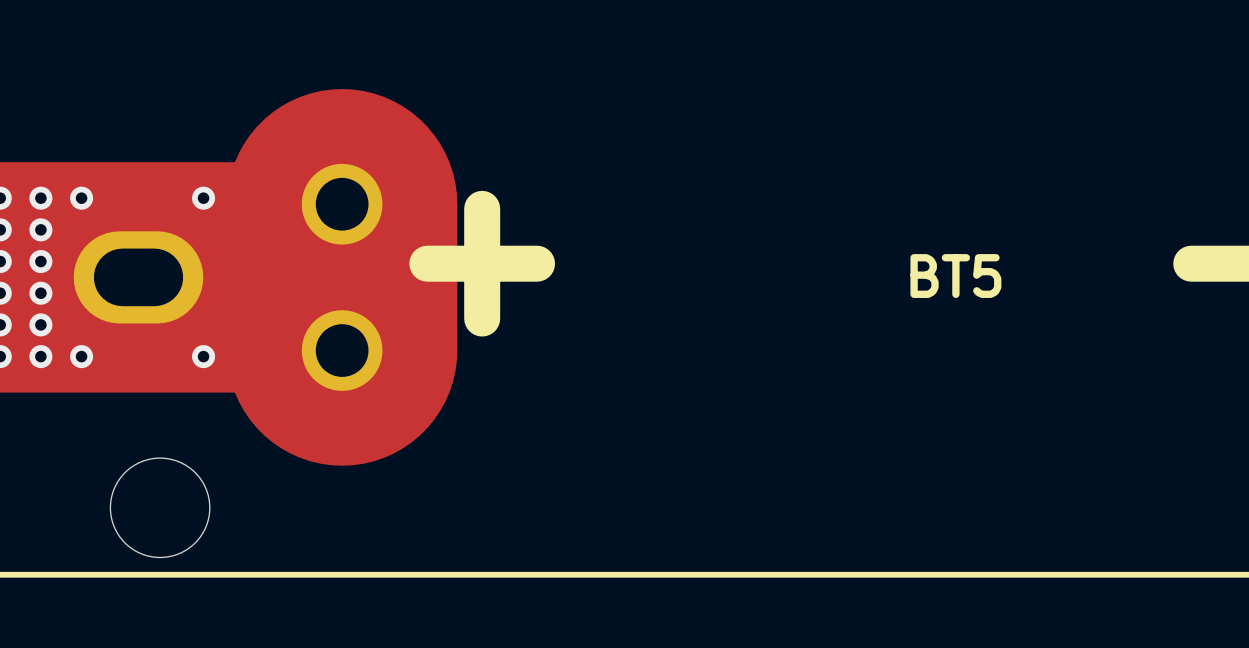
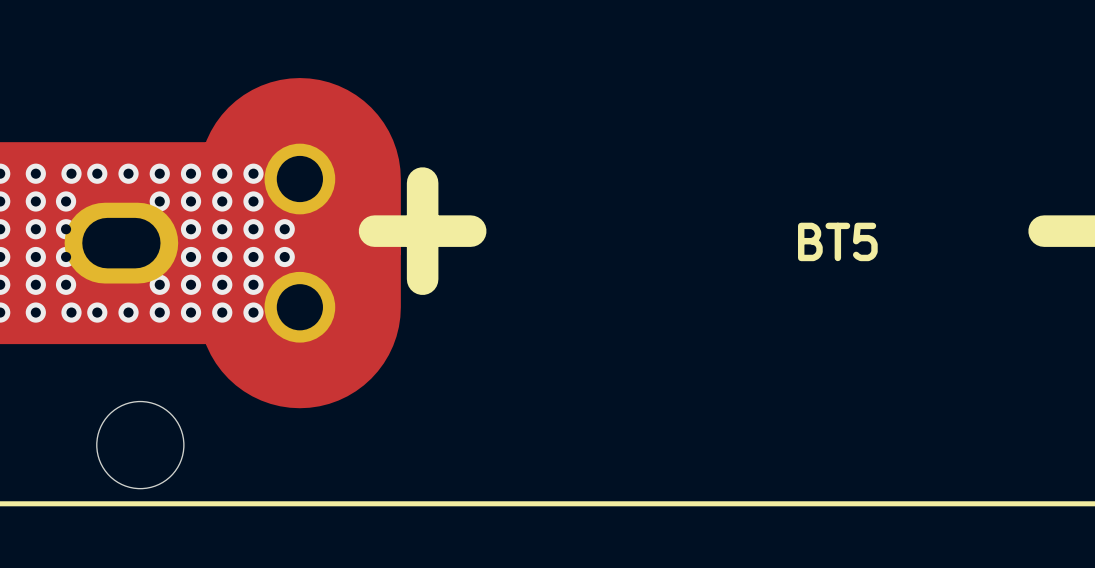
via: none -> (97, 173)
via: none -> (128, 173)
via: none -> (159, 173)
via: (203, 198) -> none
via: none -> (191, 173)
via: none -> (222, 173)
via: none -> (253, 173)
via: none -> (66, 201)
via: none -> (159, 201)
via: none -> (191, 201)
via: none -> (222, 201)
via: none -> (253, 201)
via: none -> (66, 229)
via: none -> (191, 229)
via: none -> (222, 229)
via: none -> (253, 229)
via: none -> (284, 229)
via: none -> (66, 257)
via: none -> (191, 257)
via: none -> (222, 257)
via: none -> (253, 257)
via: none -> (284, 257)
via: none -> (66, 284)
via: none -> (159, 284)
via: none -> (191, 284)
via: none -> (222, 284)
via: none -> (253, 284)
via: none -> (97, 312)
via: none -> (128, 312)
via: none -> (159, 312)
via: (203, 356) -> none
via: none -> (191, 312)
via: none -> (222, 312)
via: none -> (253, 312)

